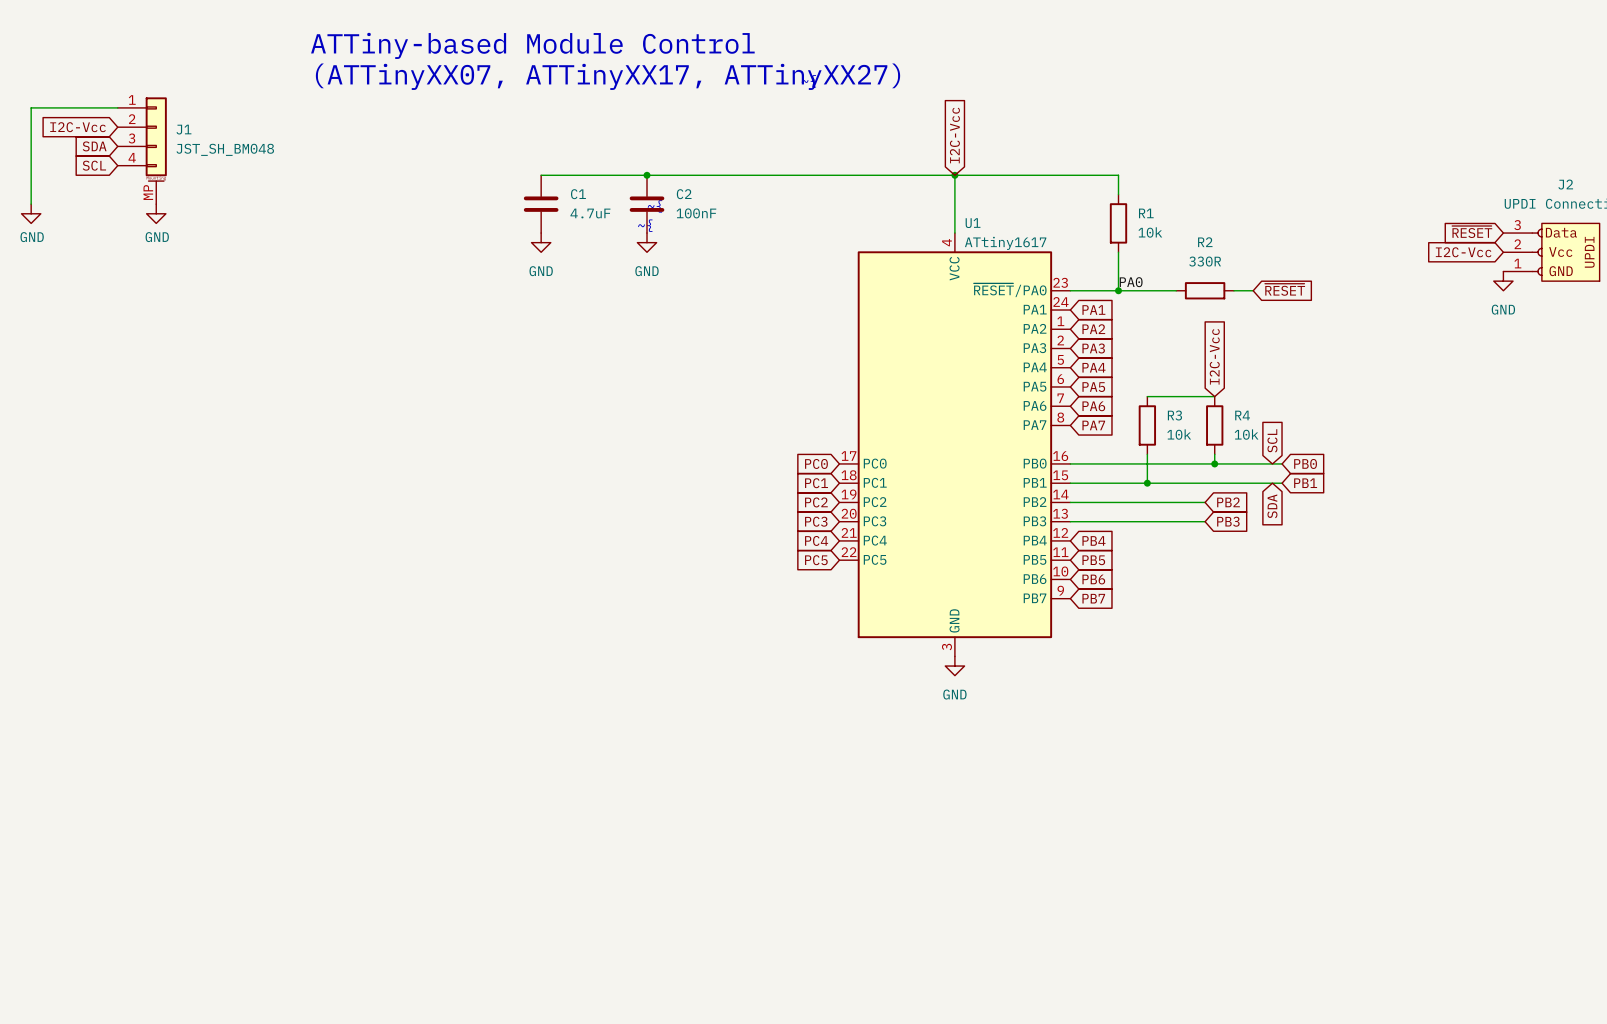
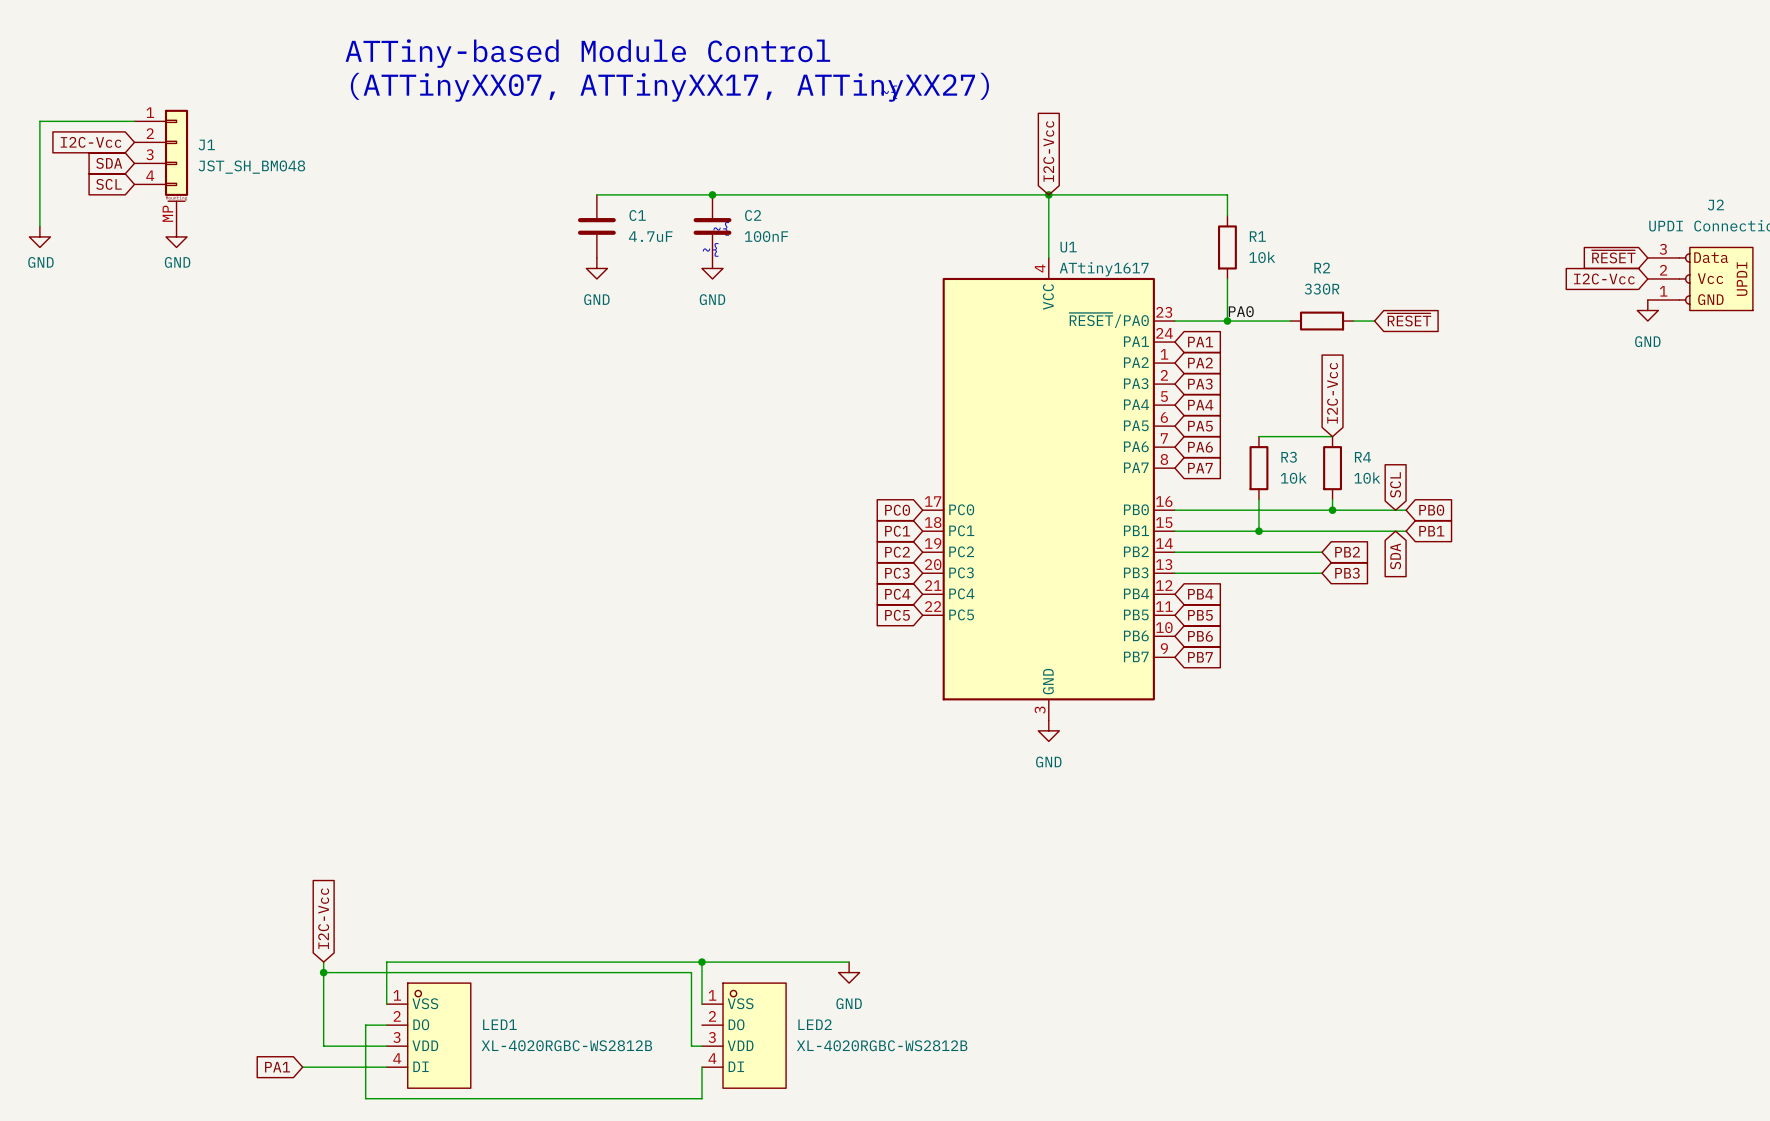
global label: none -> I2C-Vcc (323, 918)
wire: none -> (323, 962) (323, 1046) (386, 1046)
wire: none -> (701, 962) (701, 1004)
junction: none -> (701, 962)
wire: none -> (849, 962) (386, 962) (386, 1004)
wire: none -> (323, 972) (691, 972) (691, 1046) (701, 1046)
junction: none -> (323, 972)
power symbol: none -> GND (849, 972)
wire: none -> (386, 1025) (365, 1025) (365, 1098) (701, 1098) (701, 1067)
LED1: none -> XL-4020RGBC-WS2812B (428, 1035)
LED2: none -> XL-4020RGBC-WS2812B (744, 1035)
global label: none -> PA1 (277, 1067)
wire: none -> (302, 1067) (386, 1067)

